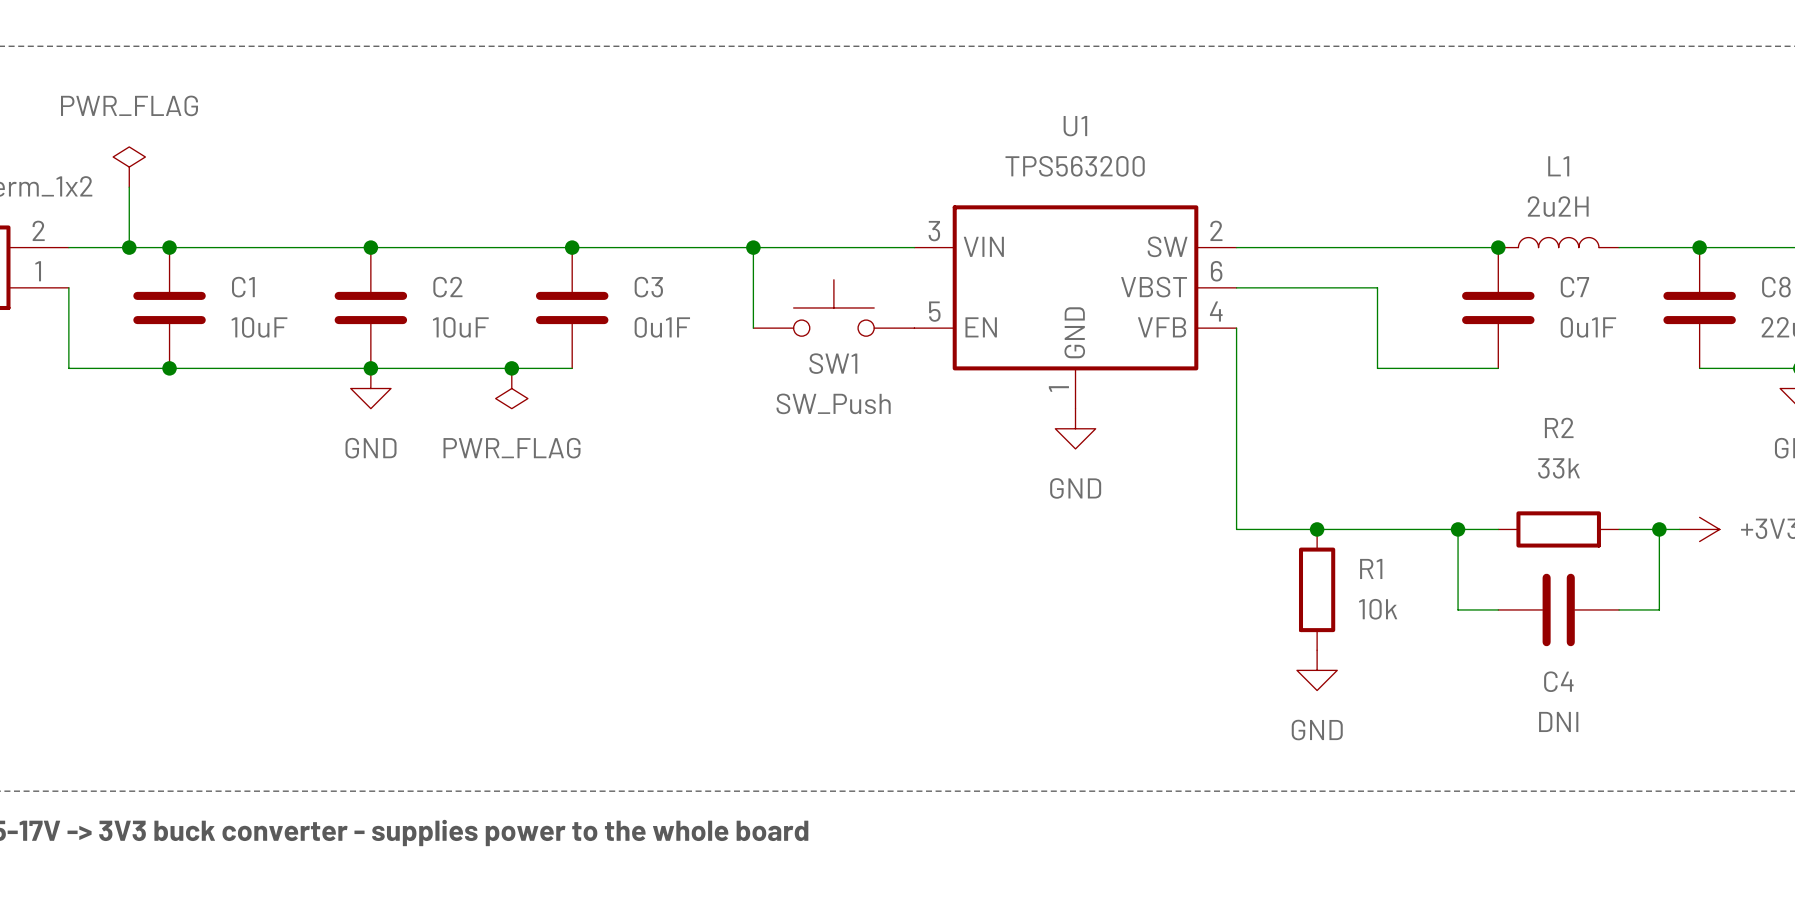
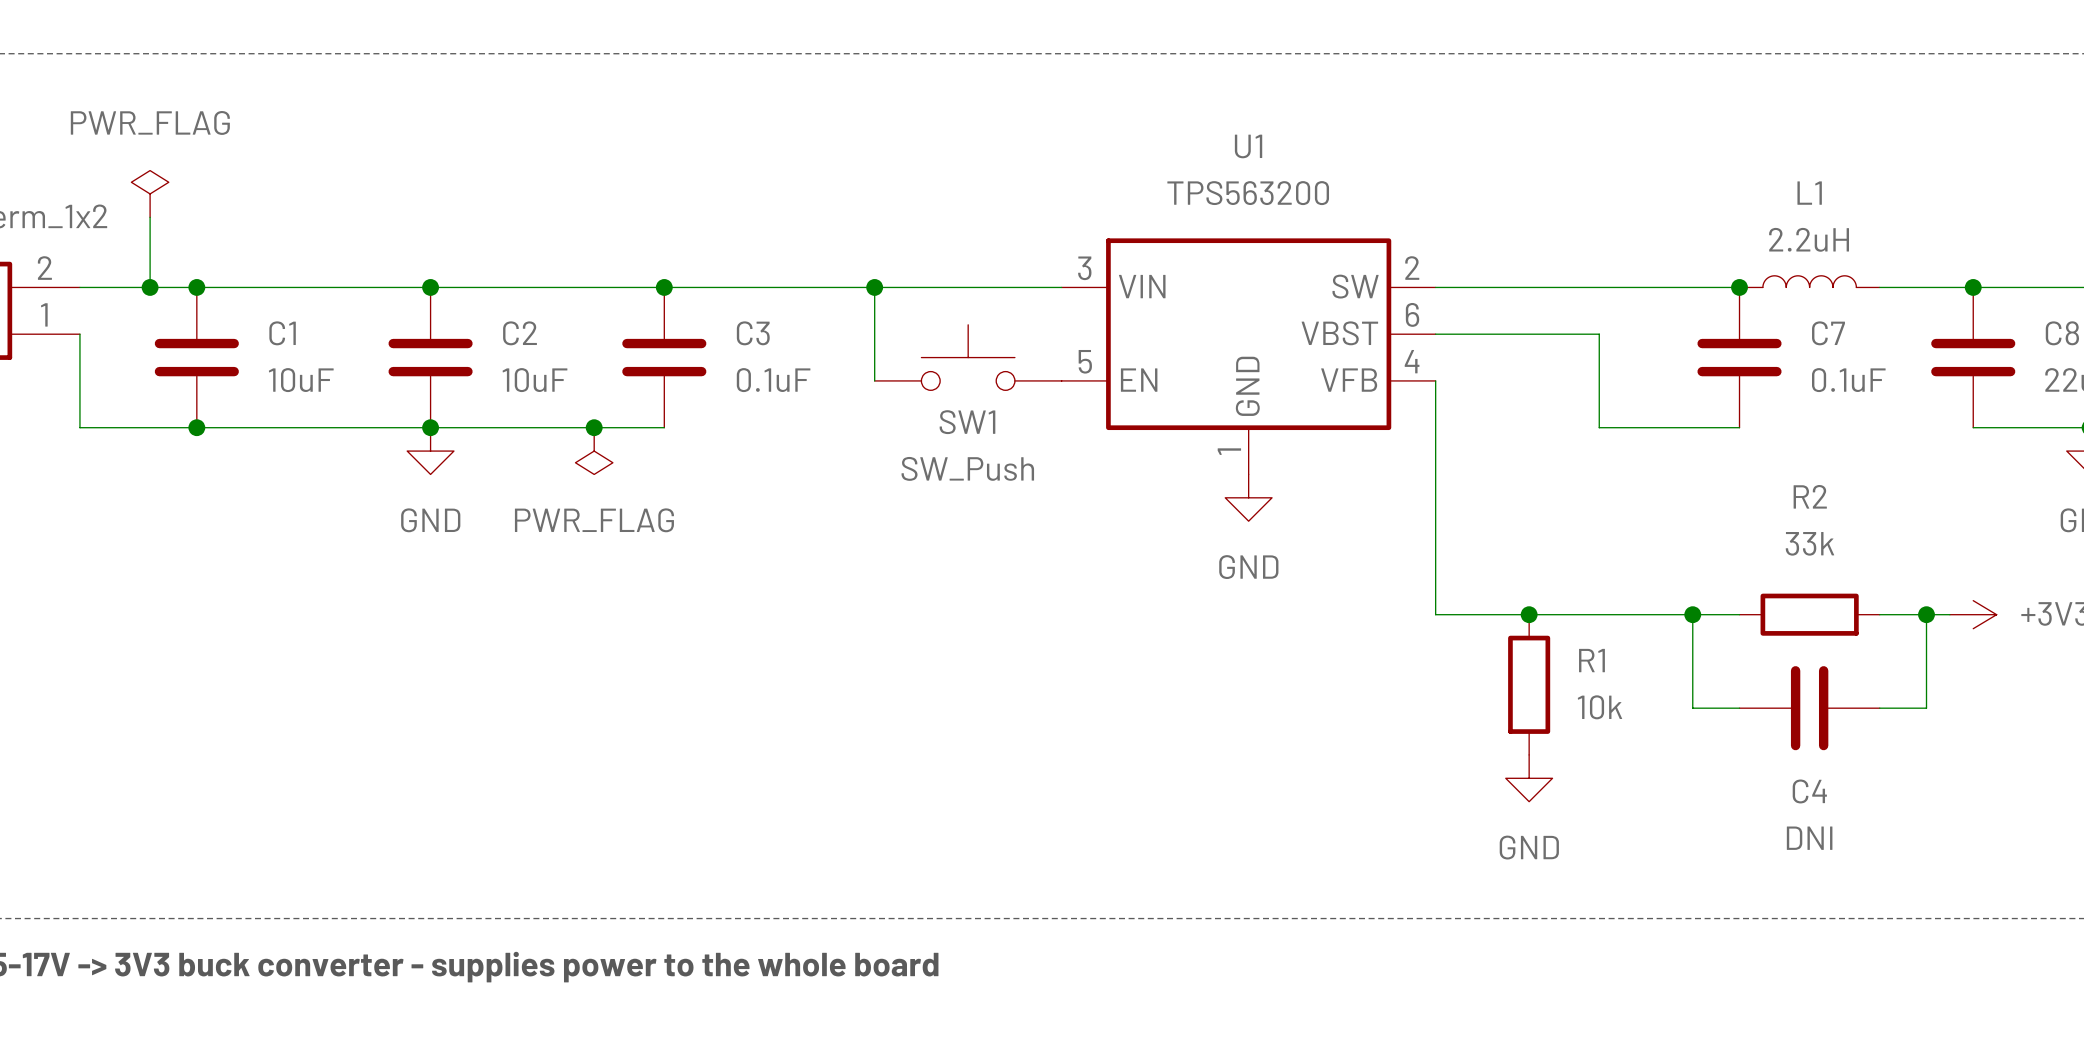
L1 value: 2u2H (1558, 206) -> 2.2uH (1809, 239)
C3 value: 0u1F (662, 327) -> 0.1uF (773, 380)
C7 value: 0u1F (1588, 327) -> 0.1uF (1848, 380)

